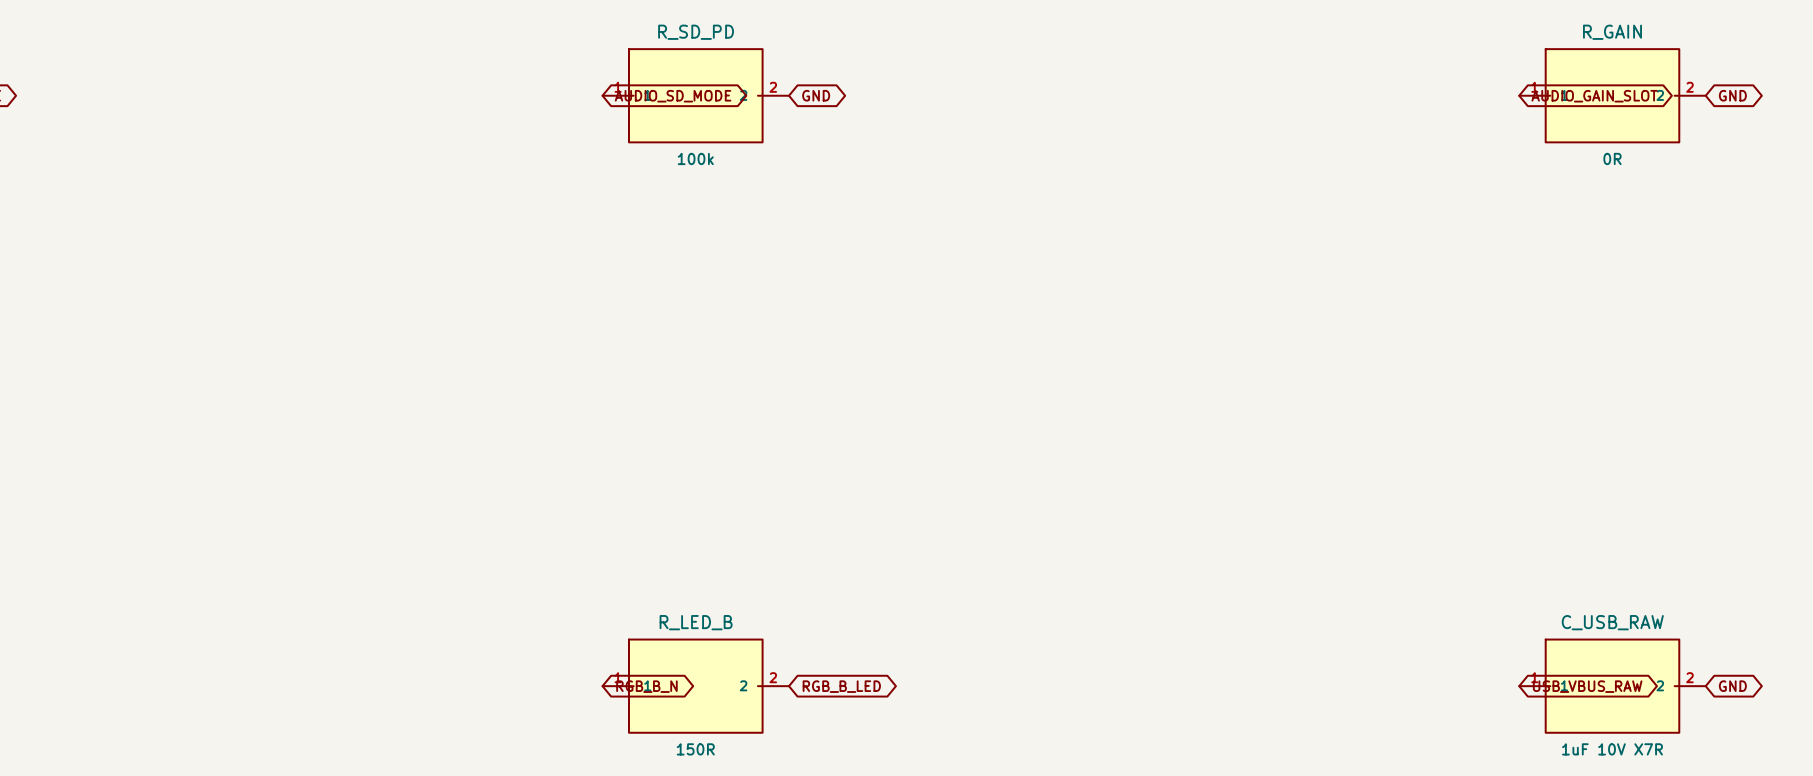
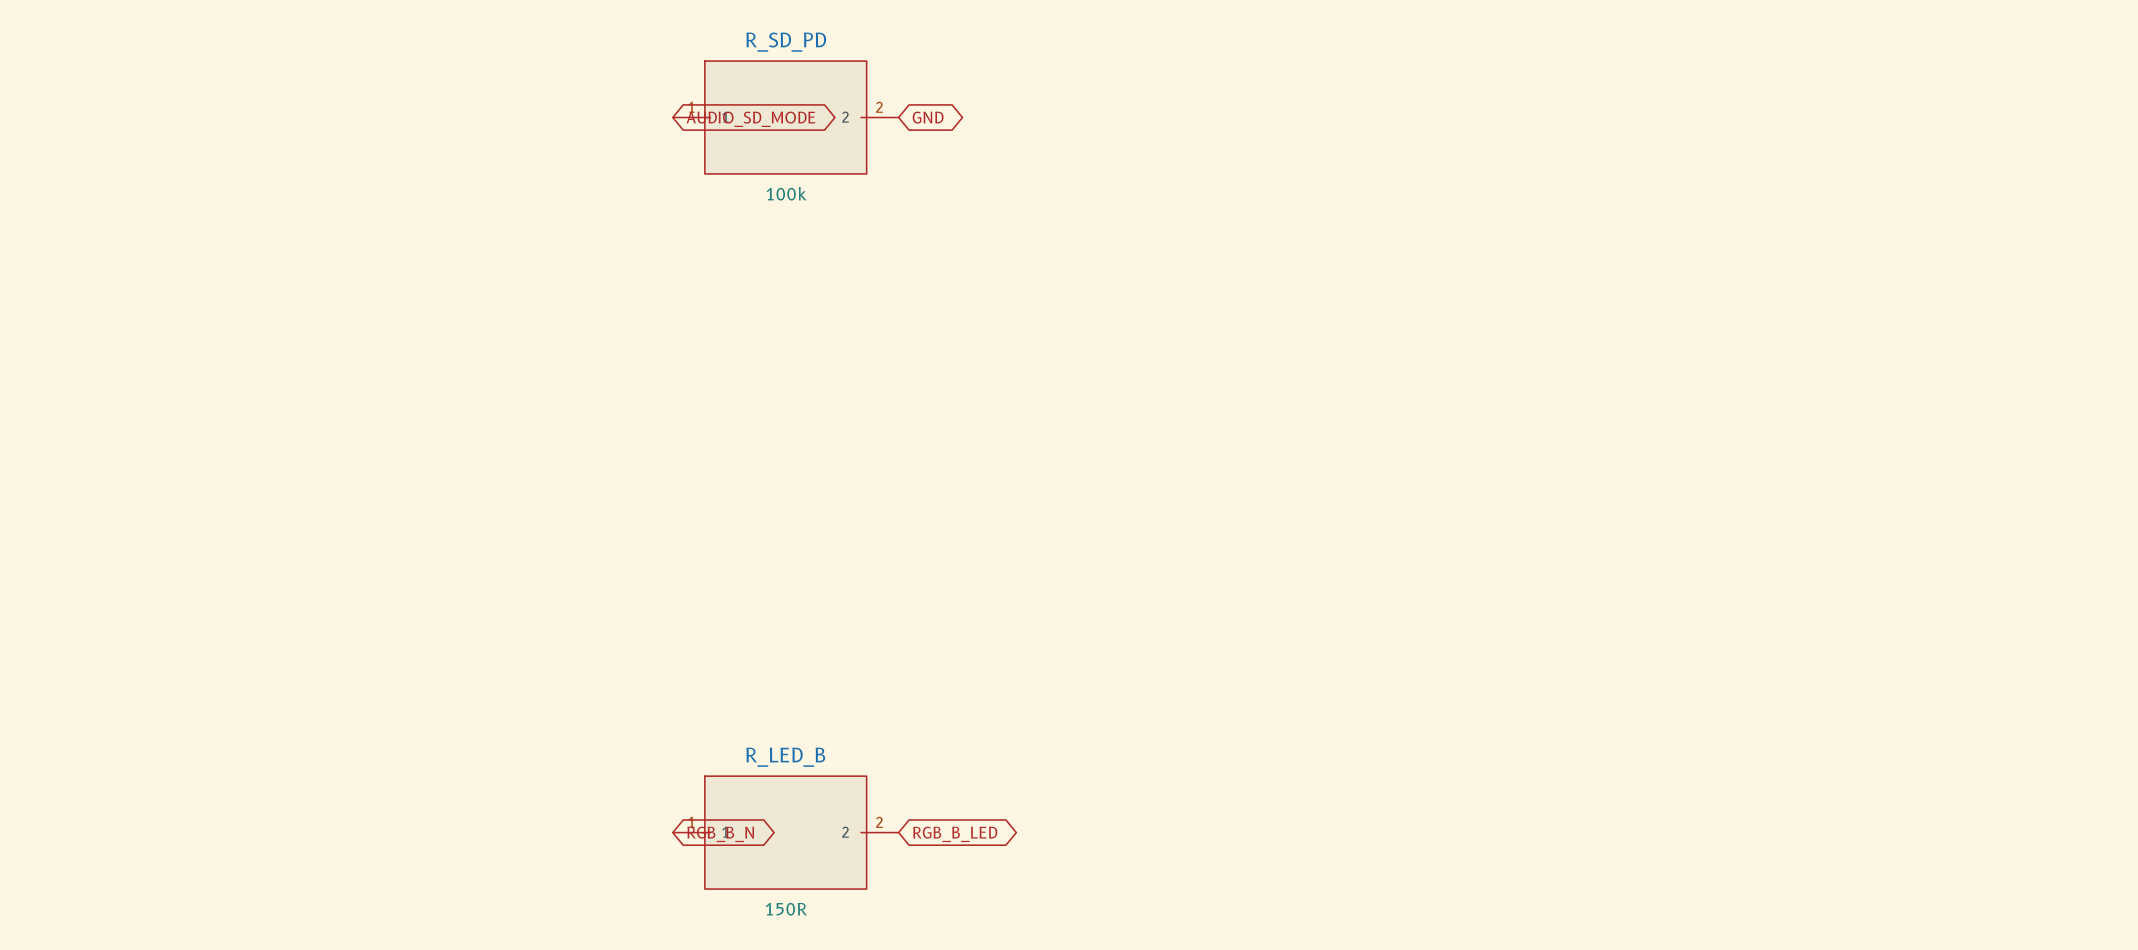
R_GAIN: 0R (1612, 95) -> none
global label: GND (1732, 95) -> none
global label: AUDIO_GAIN_SLOT (1594, 96) -> none
global label: USB_VBUS_RAW (1587, 686) -> none
C_USB_RAW: 1uF 10V X7R (1612, 686) -> none
global label: GND (1732, 686) -> none

